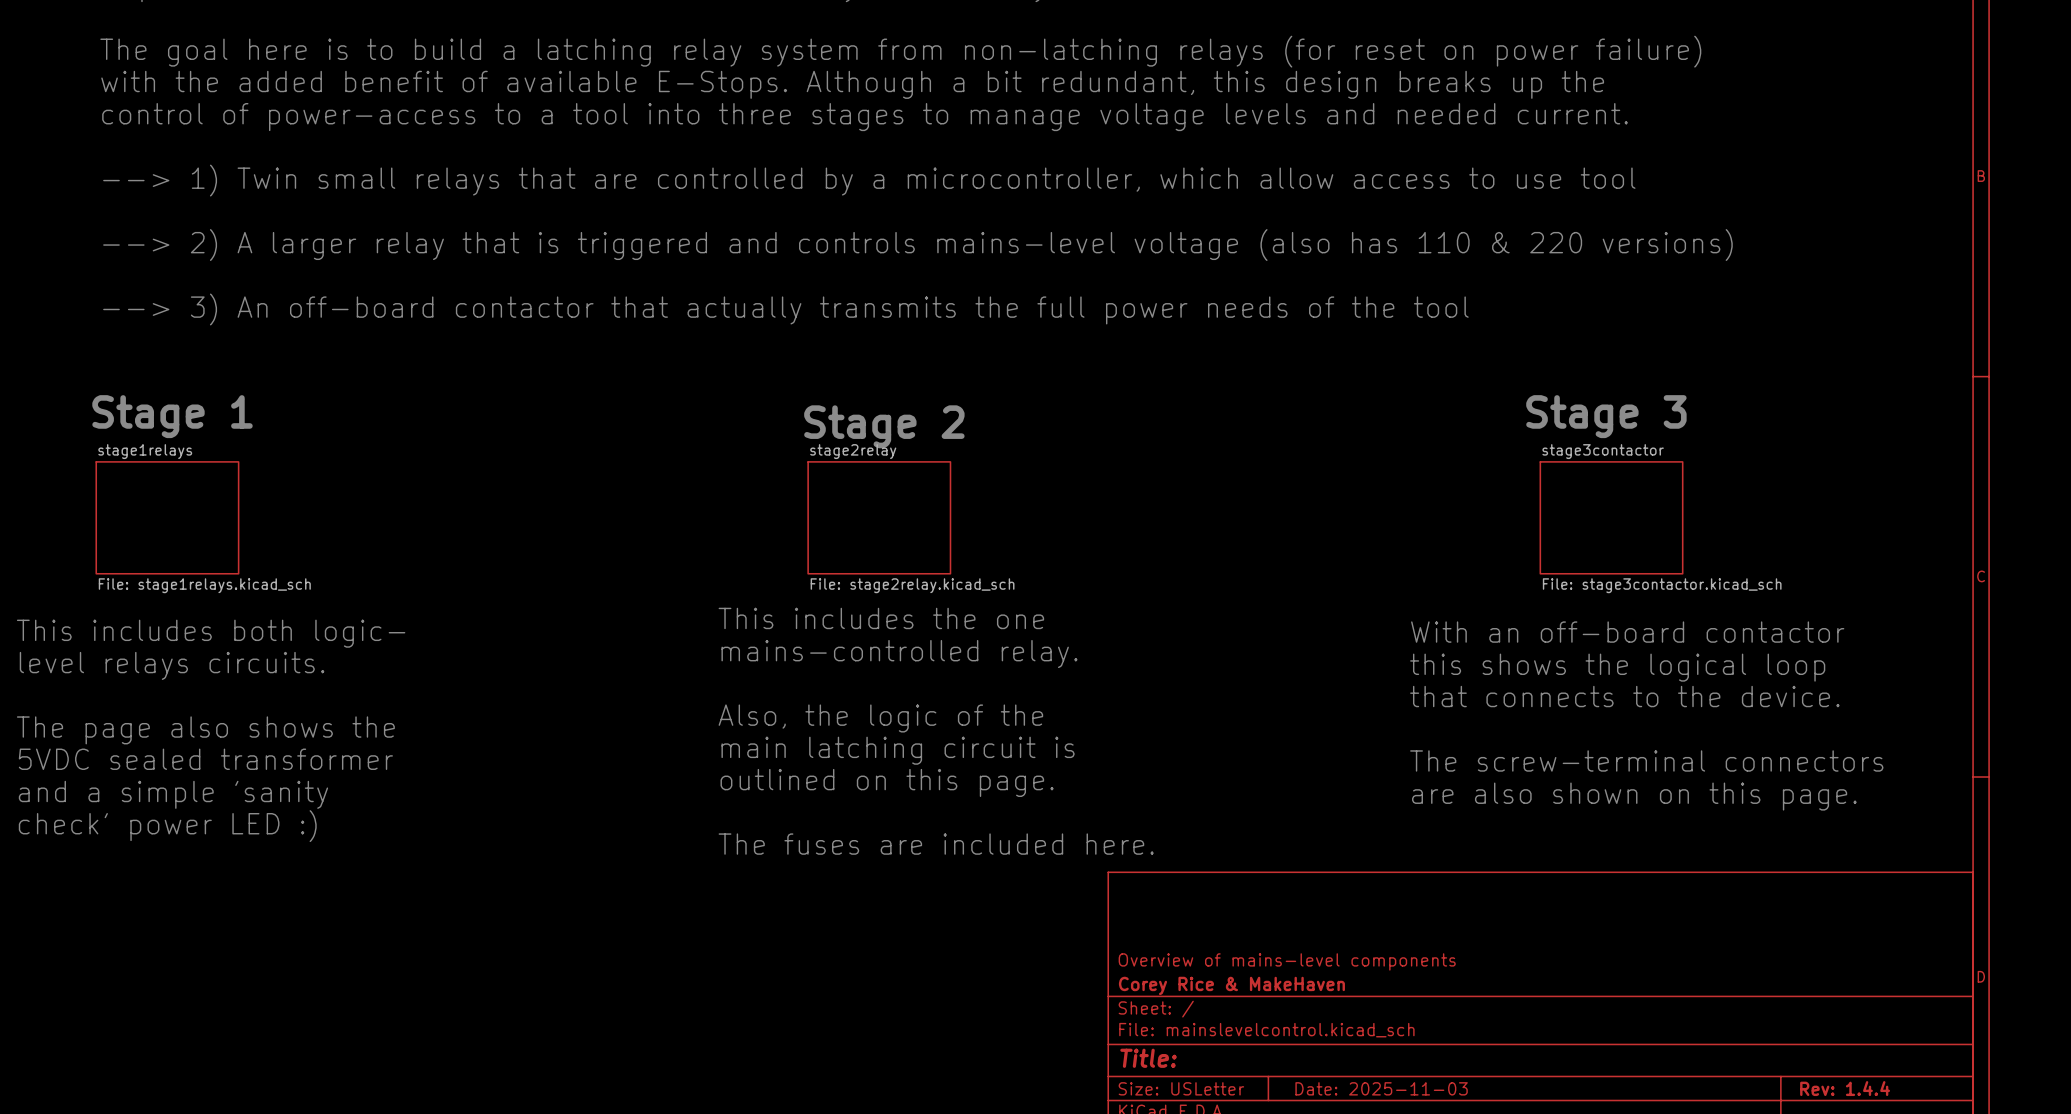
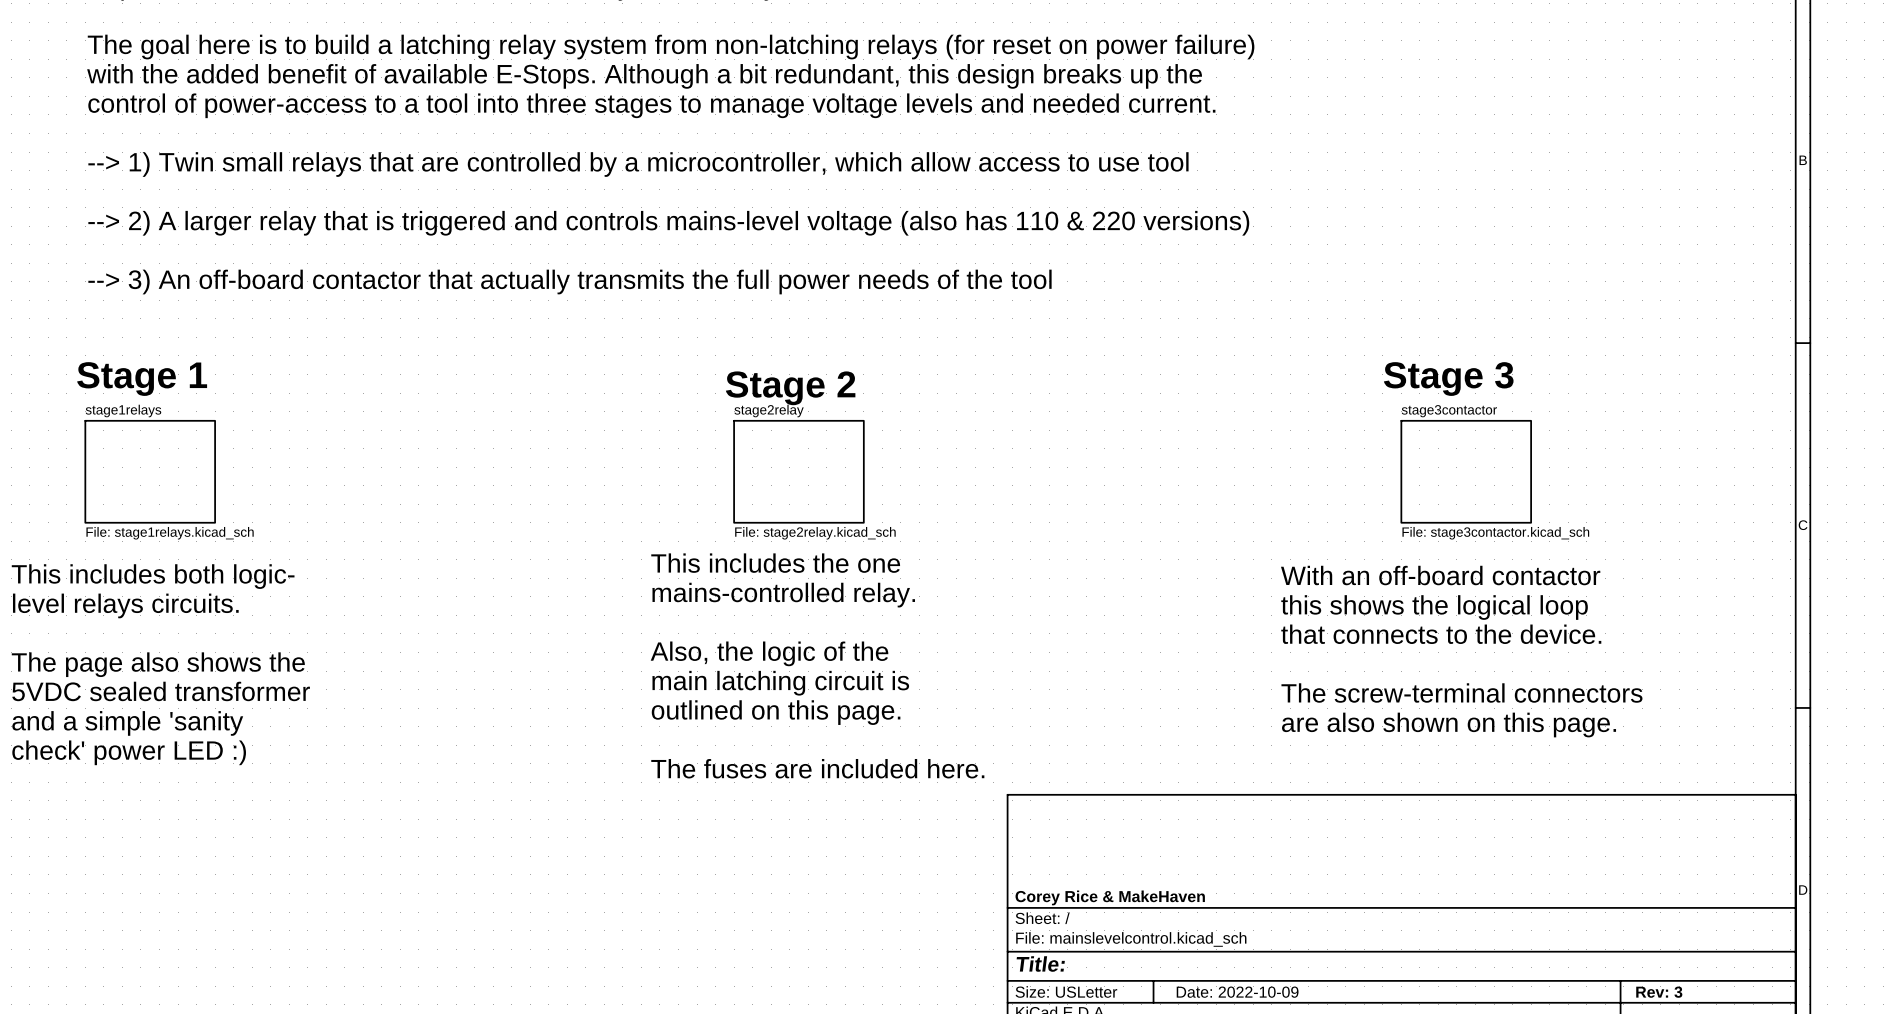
title block: Overview of mains-level components (1287, 961) -> none
title block: Date: 2025-11-03 (1381, 1088) -> Date: 2022-10-09 (1237, 992)
title block: Rev: 1.4.4 (1845, 1088) -> Rev: 3 (1659, 992)

